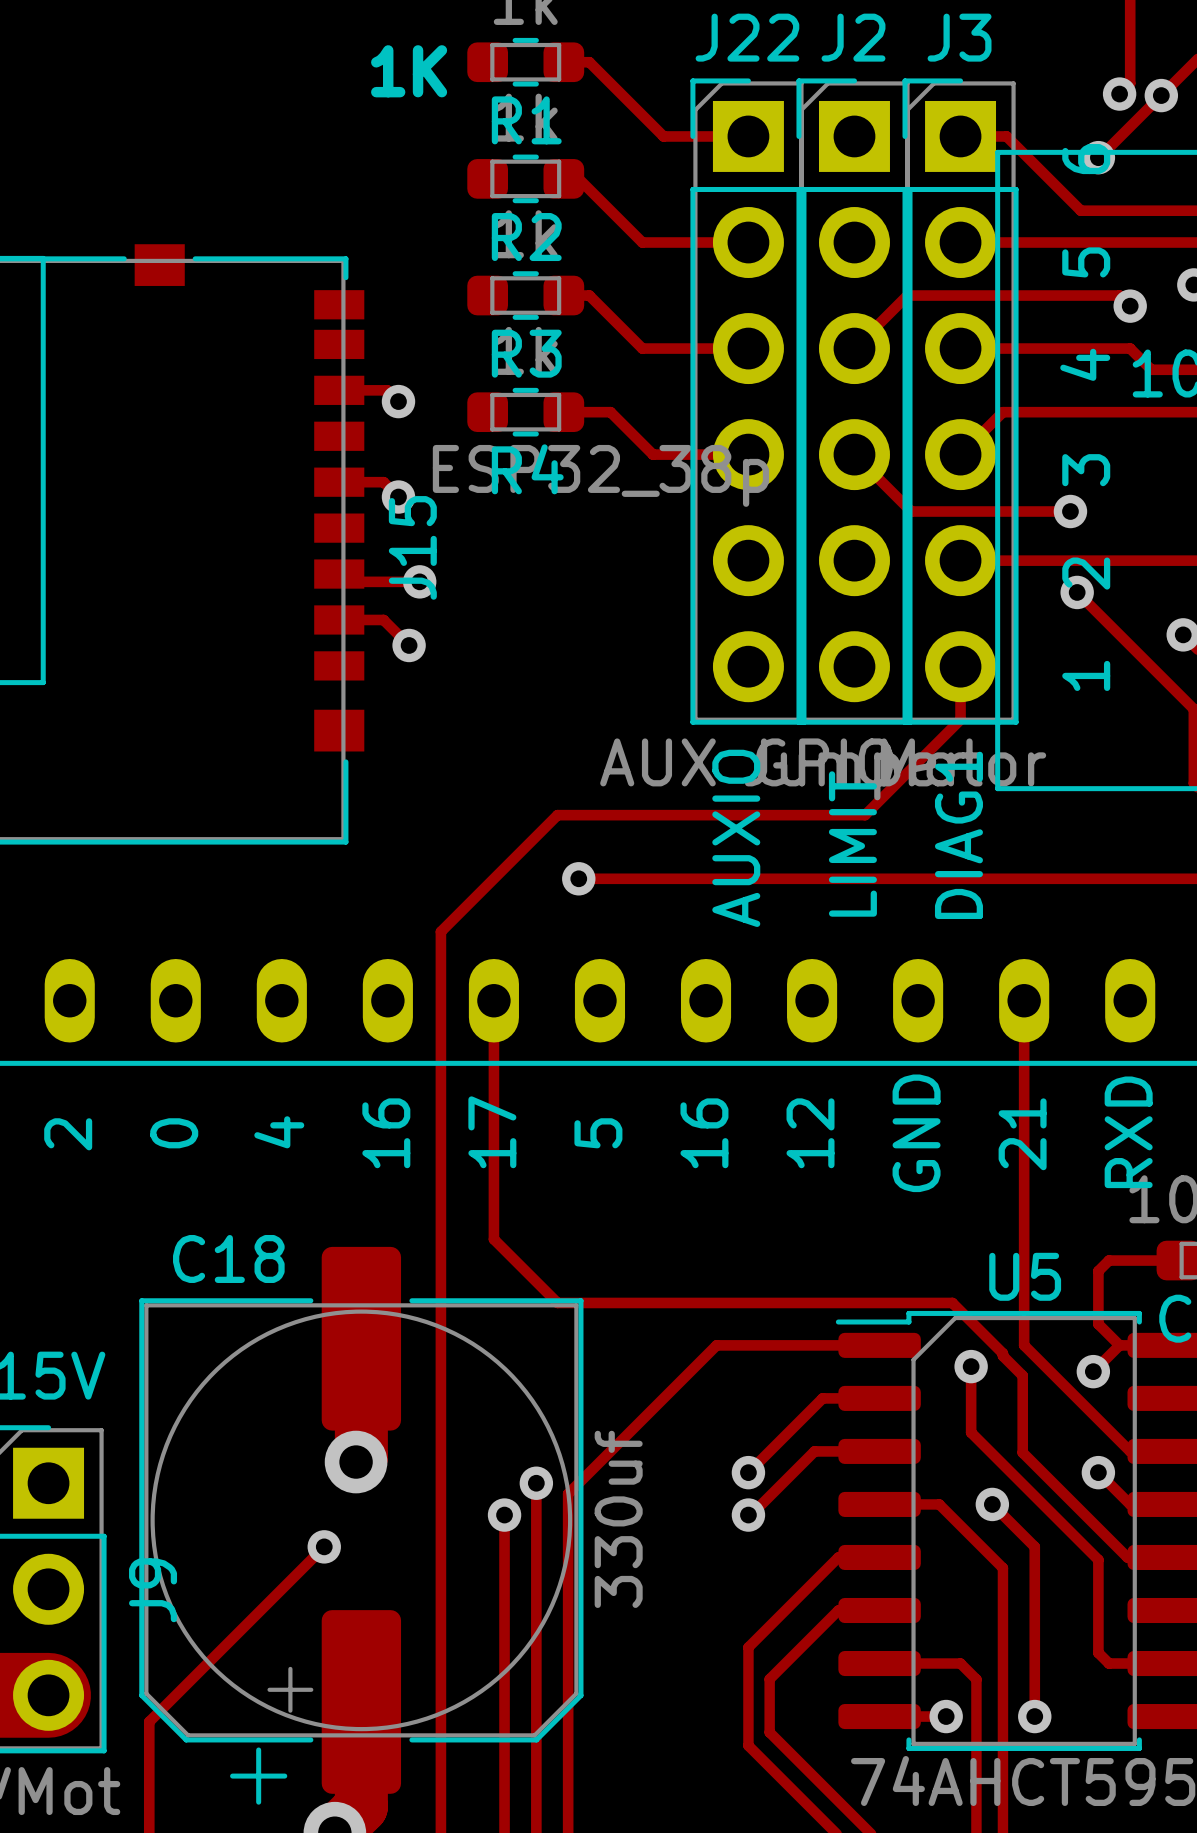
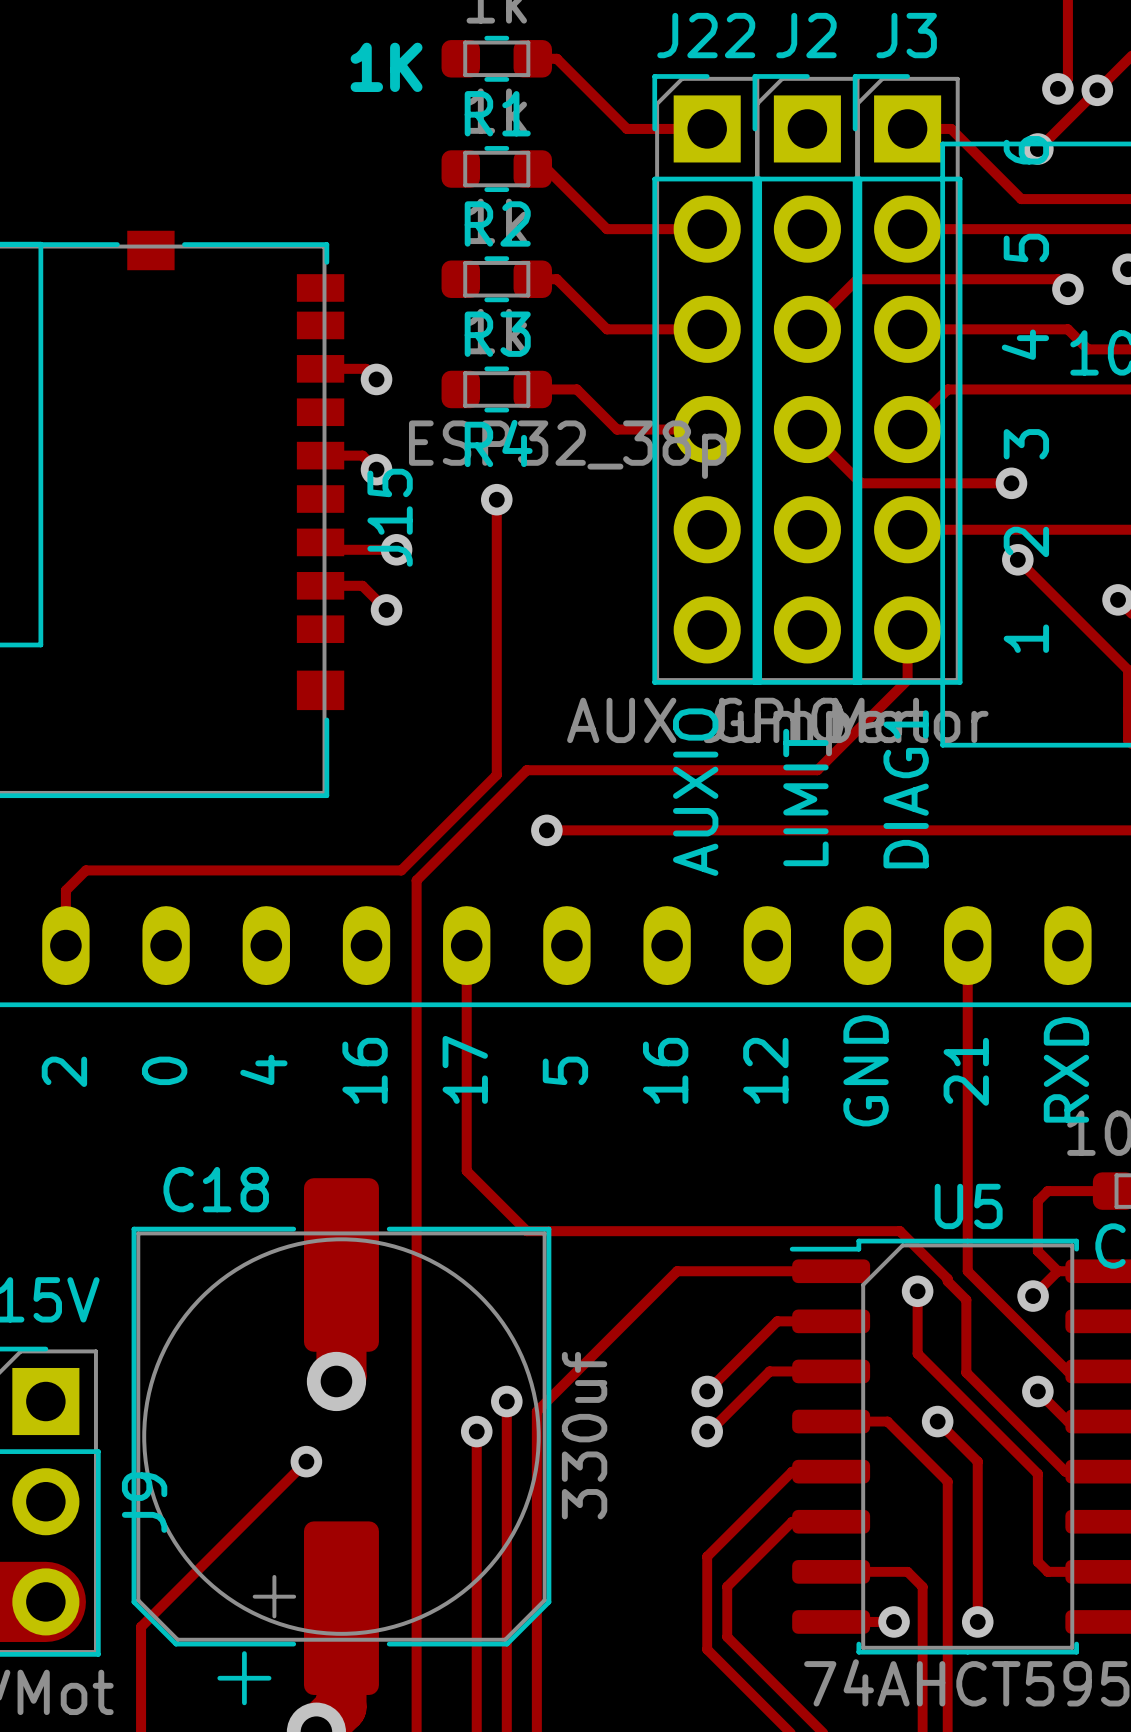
track: none -> (496, 499) (496, 774) (401, 870) (85, 870) (65, 890) (65, 945)
via: none -> (496, 499)

